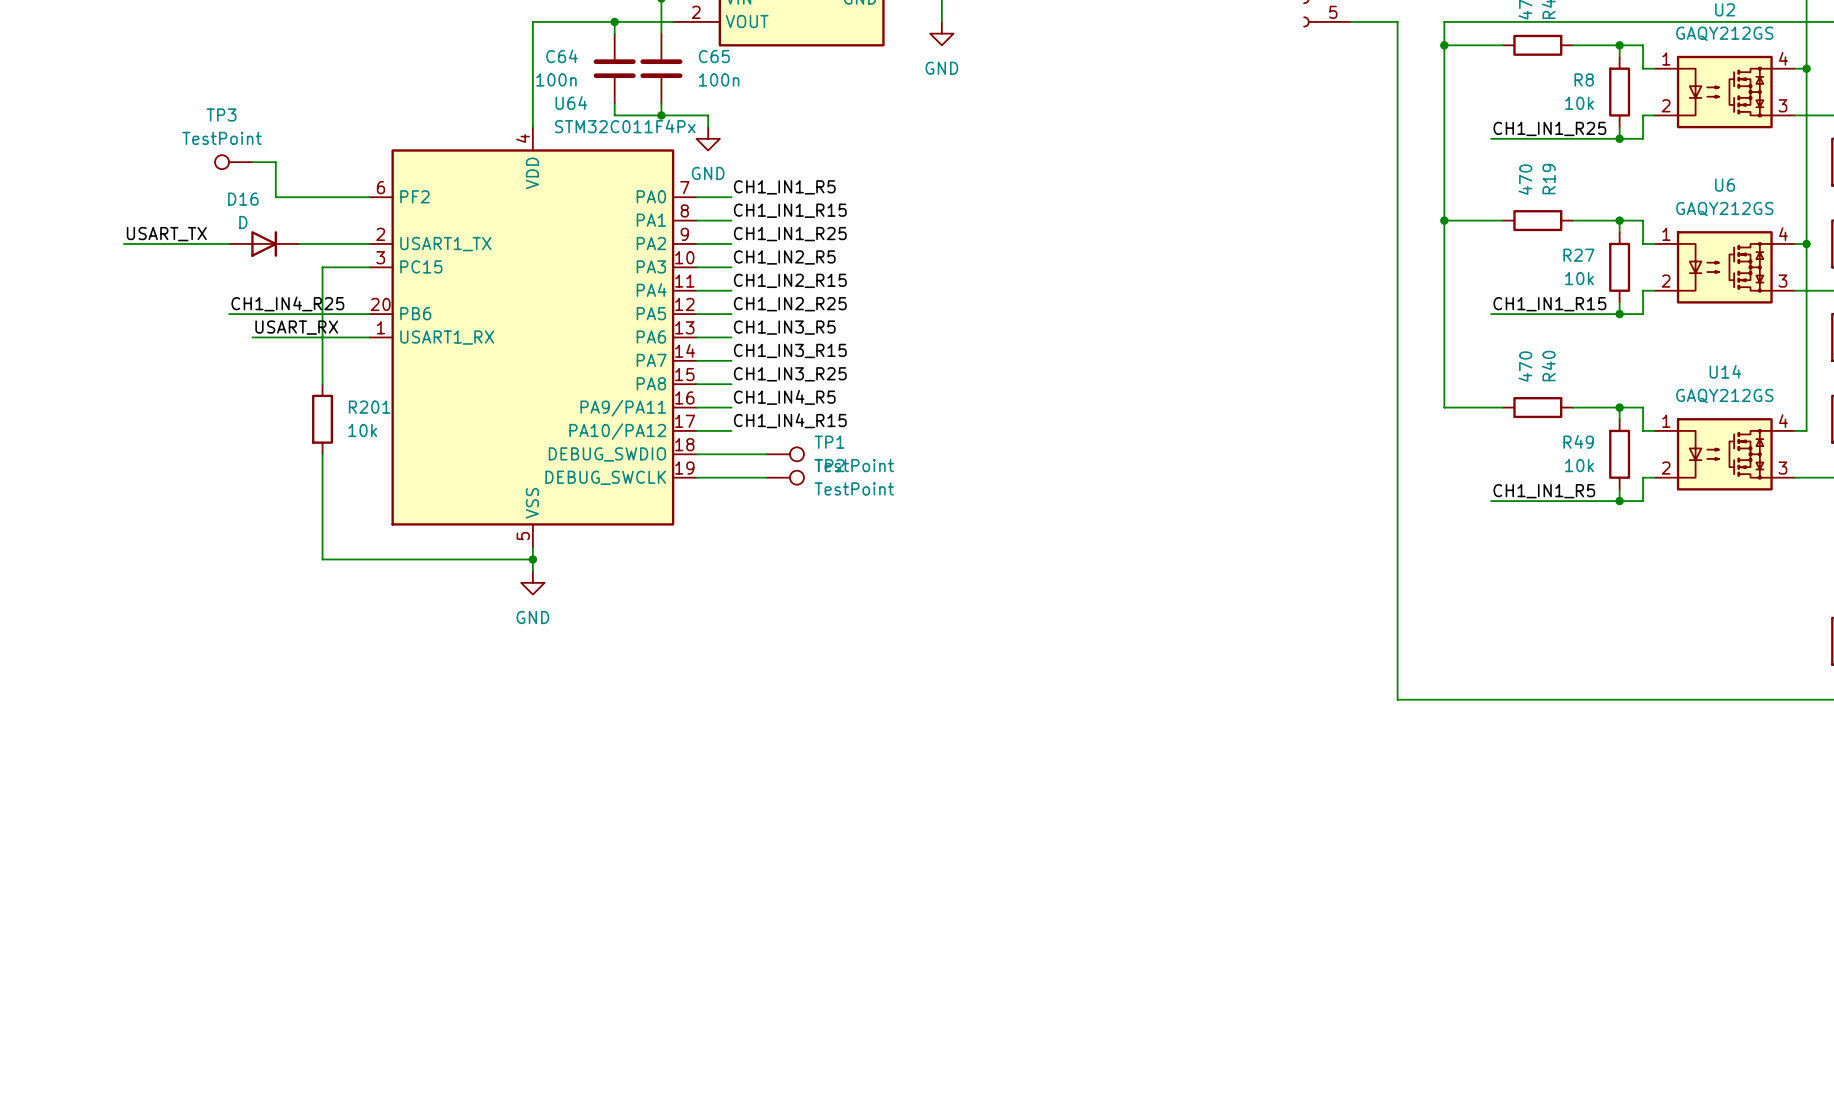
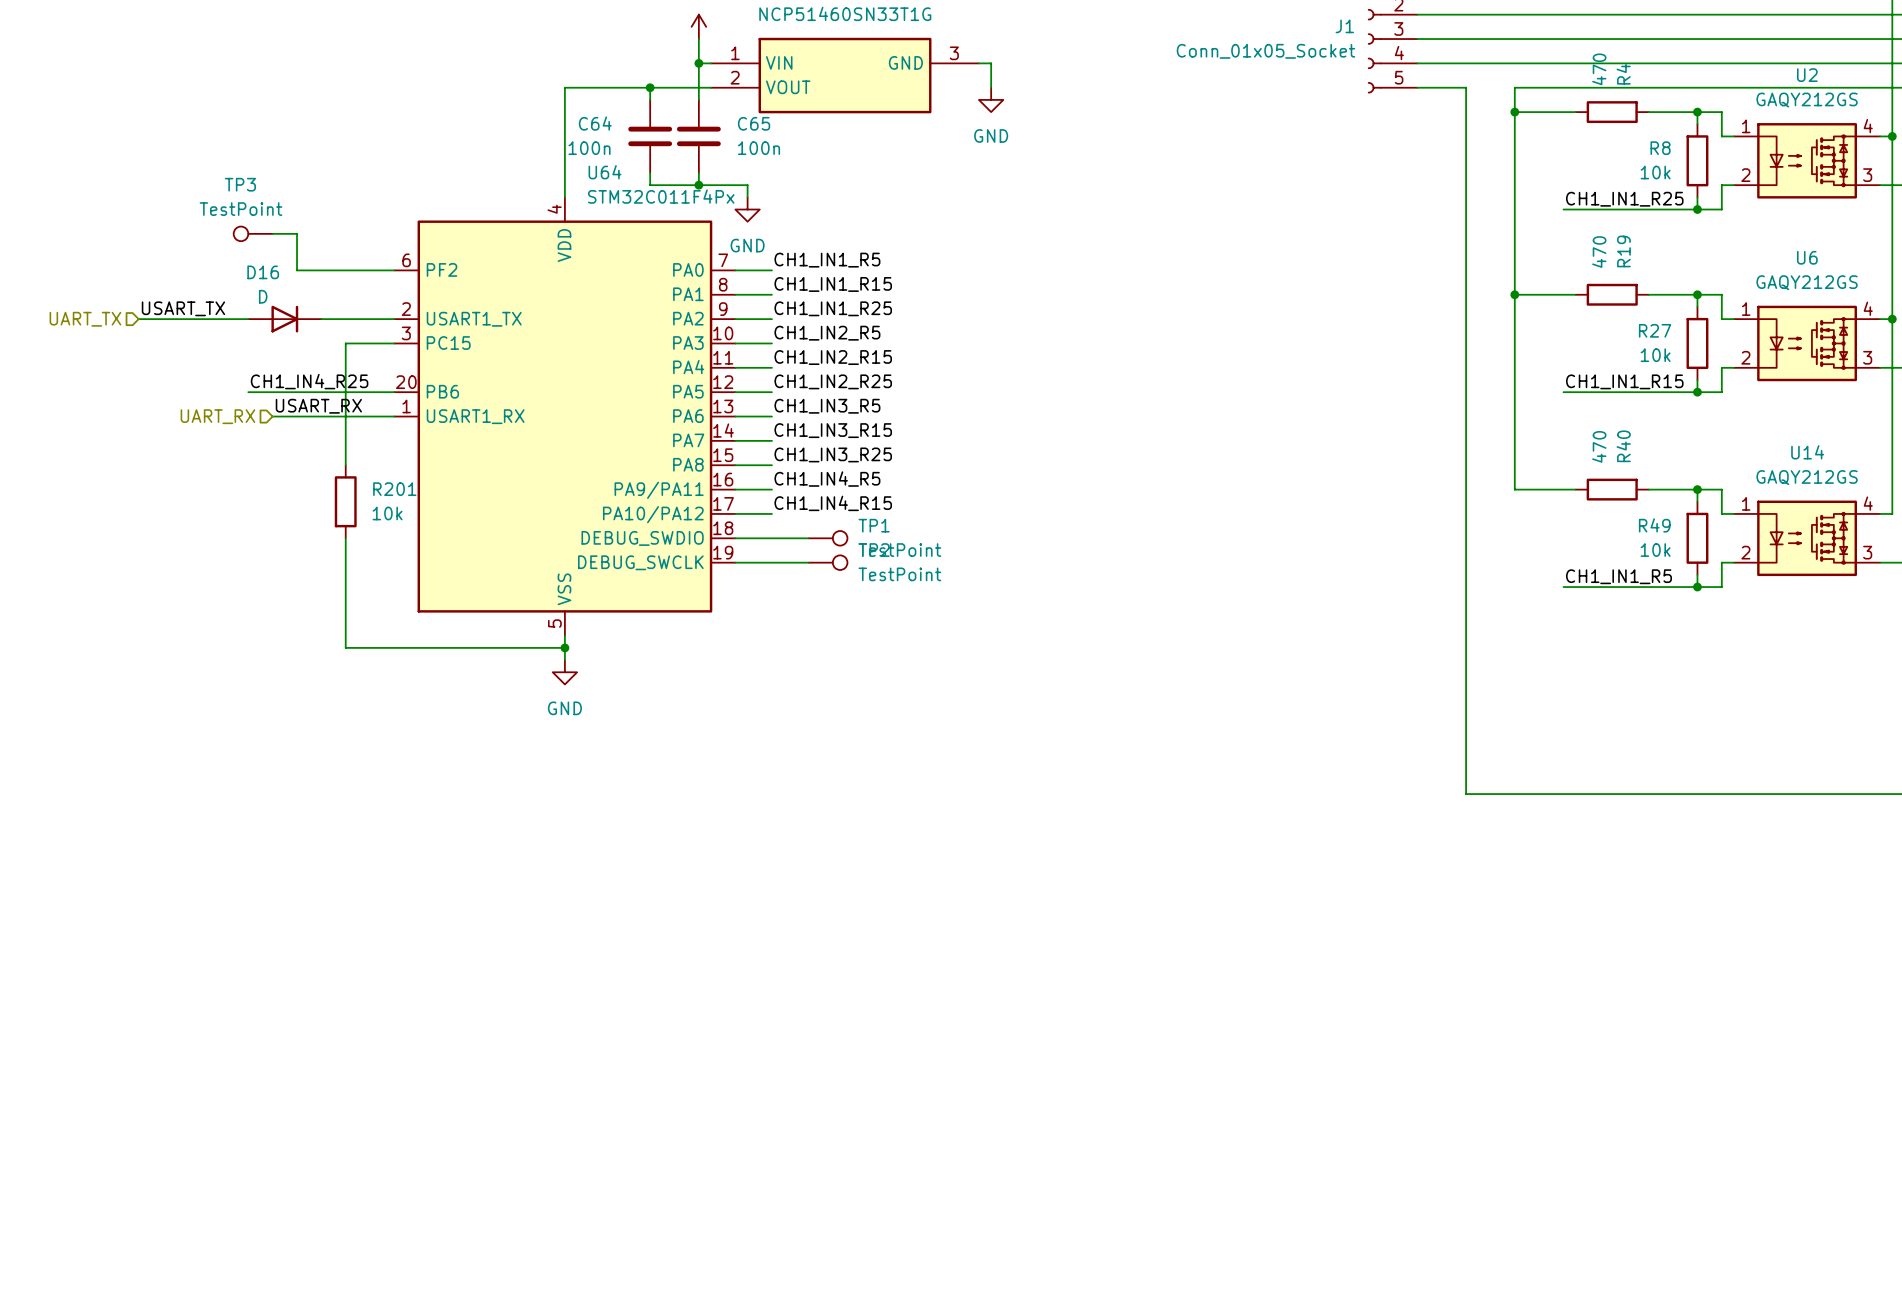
hierarchical label: none -> UART_TX (85, 319)
hierarchical label: none -> UART_RX (217, 416)

